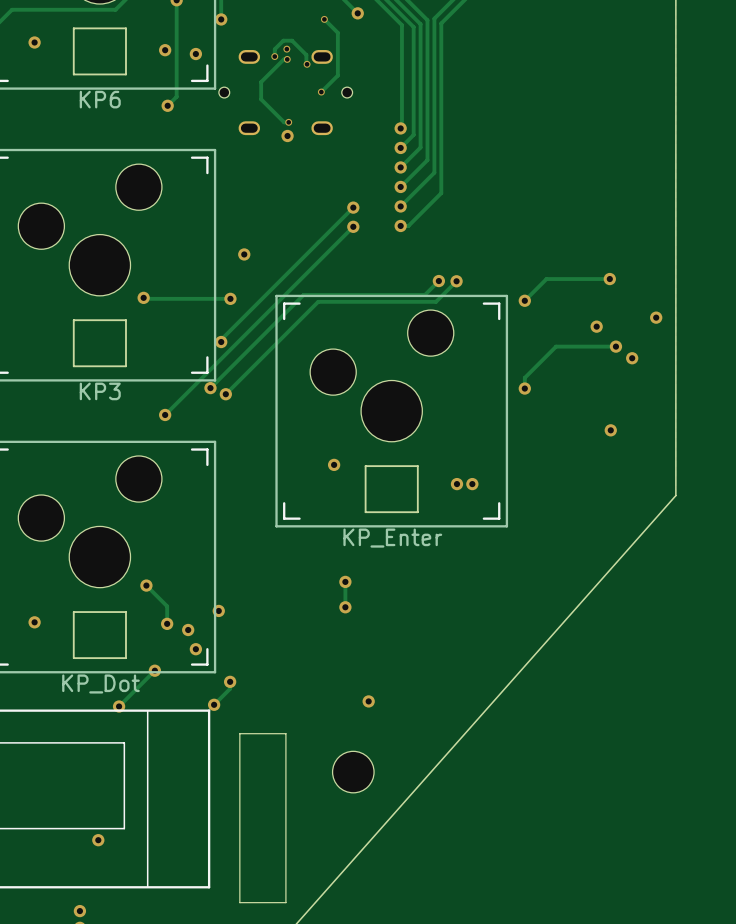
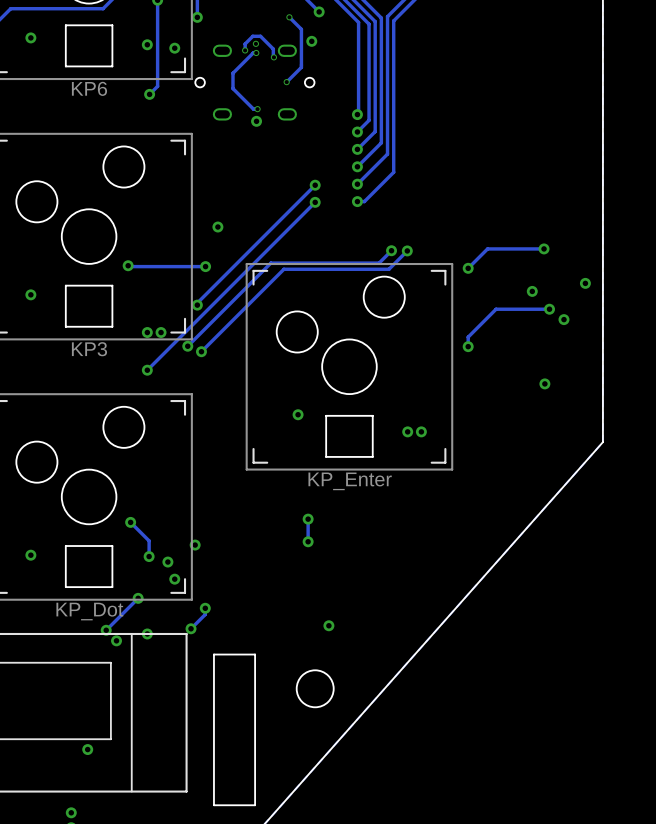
via: none -> (311, 41)
via: none -> (30, 294)
via: none -> (147, 332)
via: none -> (161, 332)
via: none -> (147, 633)
via: none -> (116, 640)

